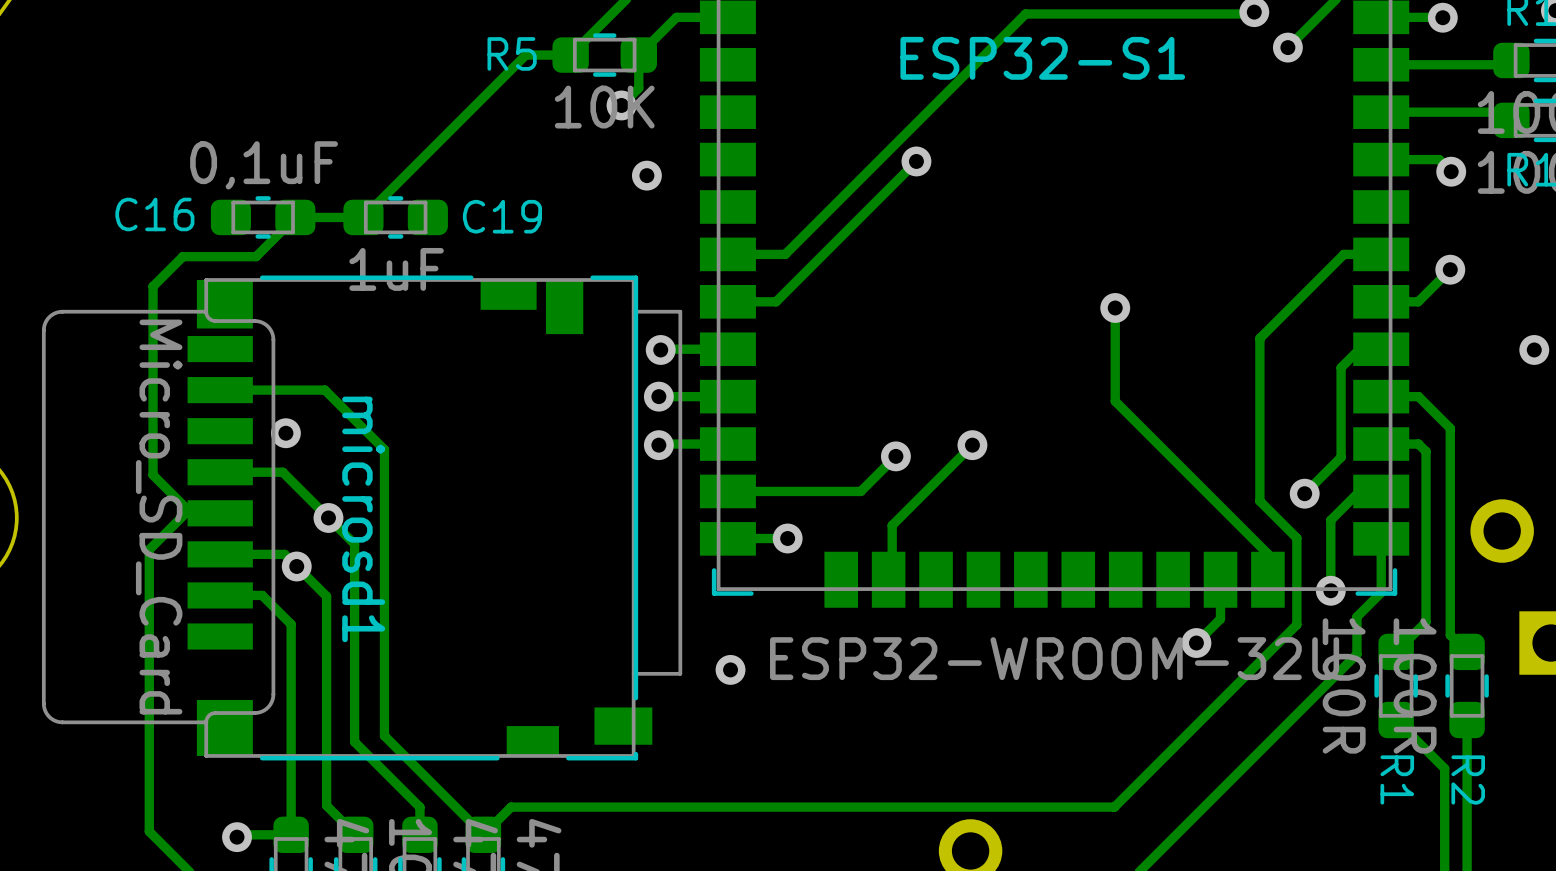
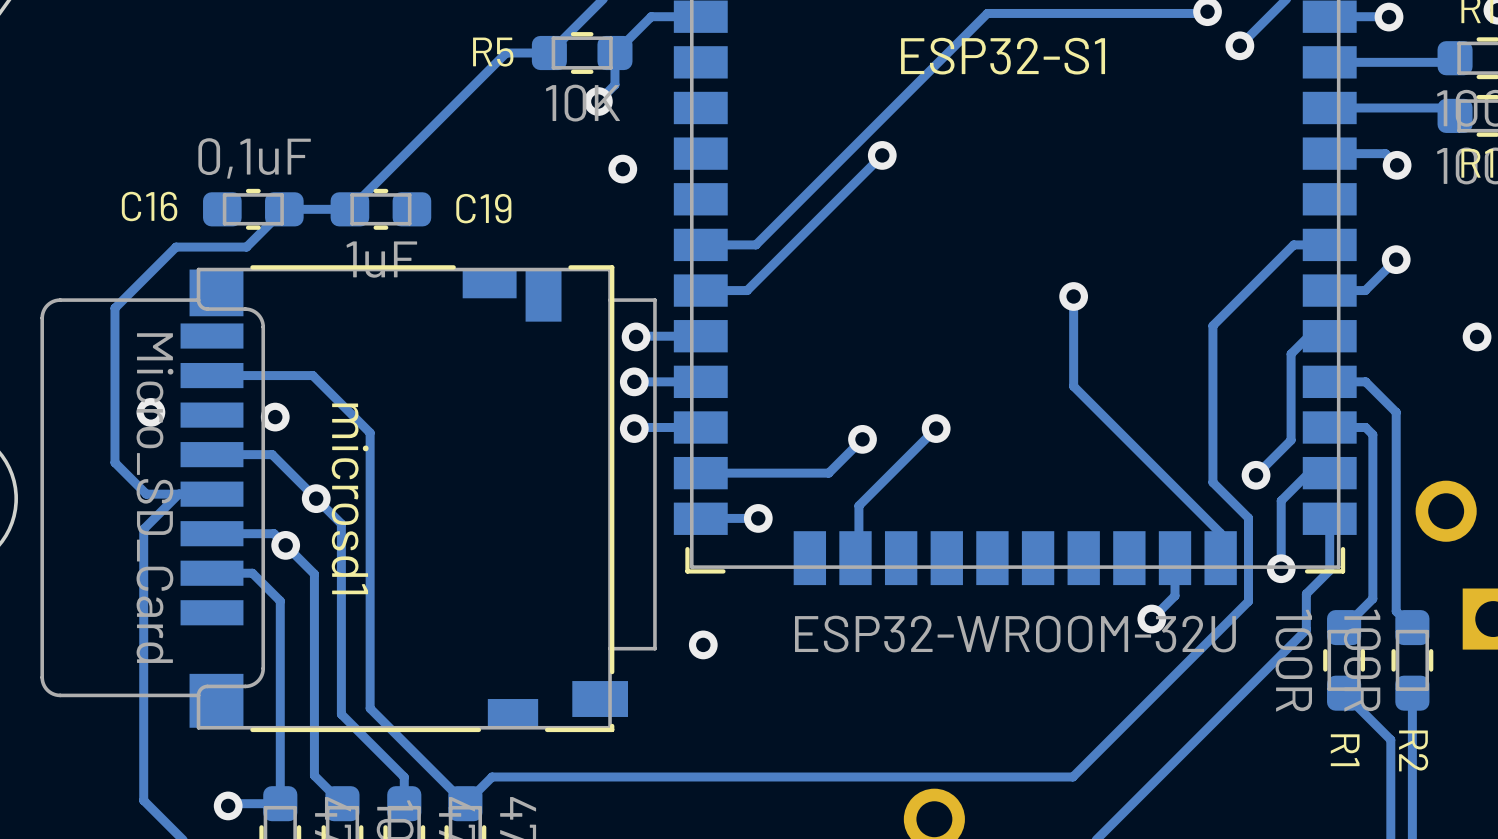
track: (153, 286) (153, 475) (191, 513) -> (147, 275) (114, 308) (114, 462) (146, 494) (178, 494)
via: none -> (150, 412)

